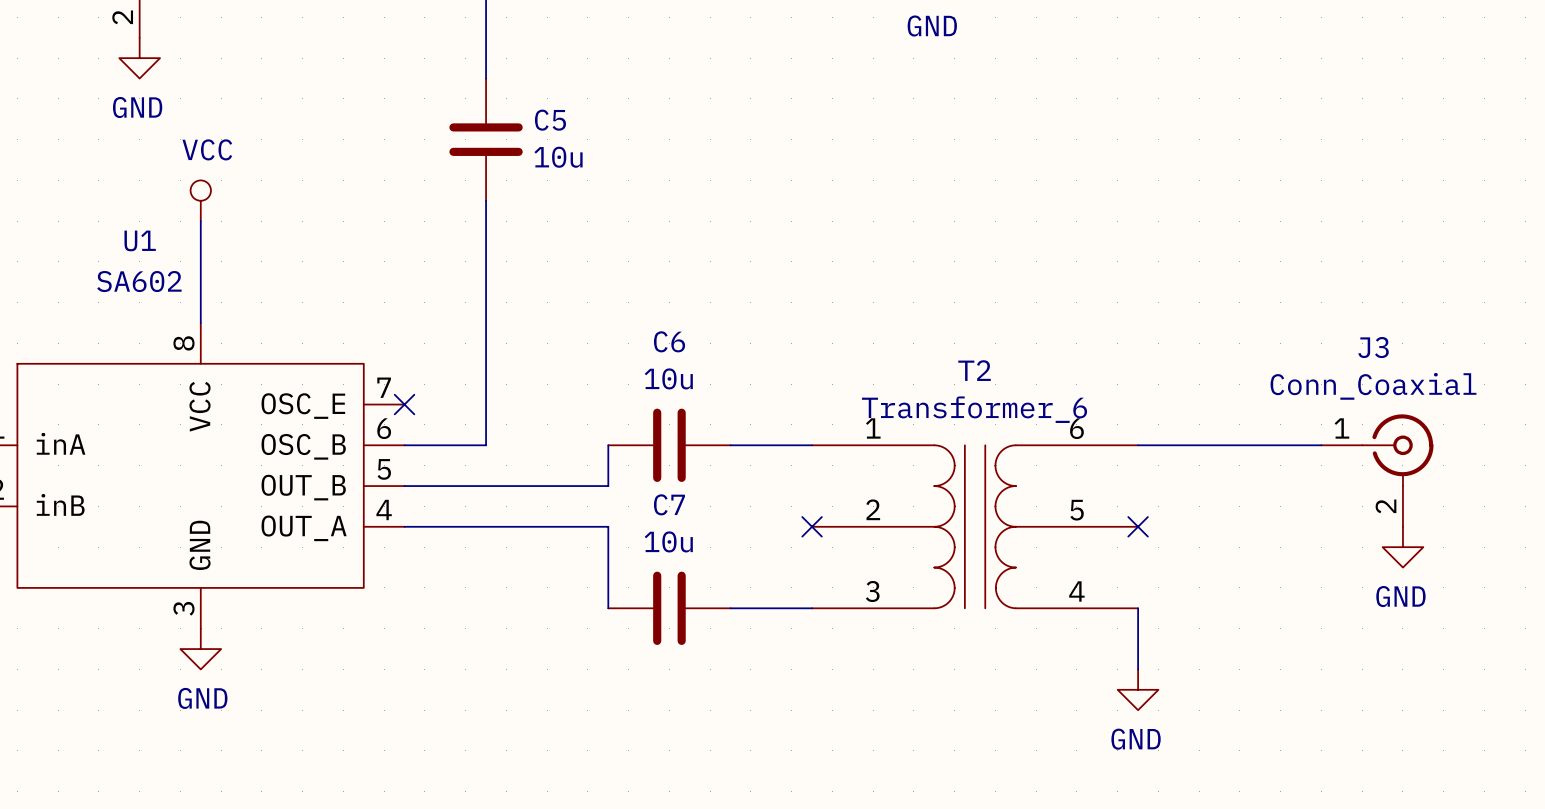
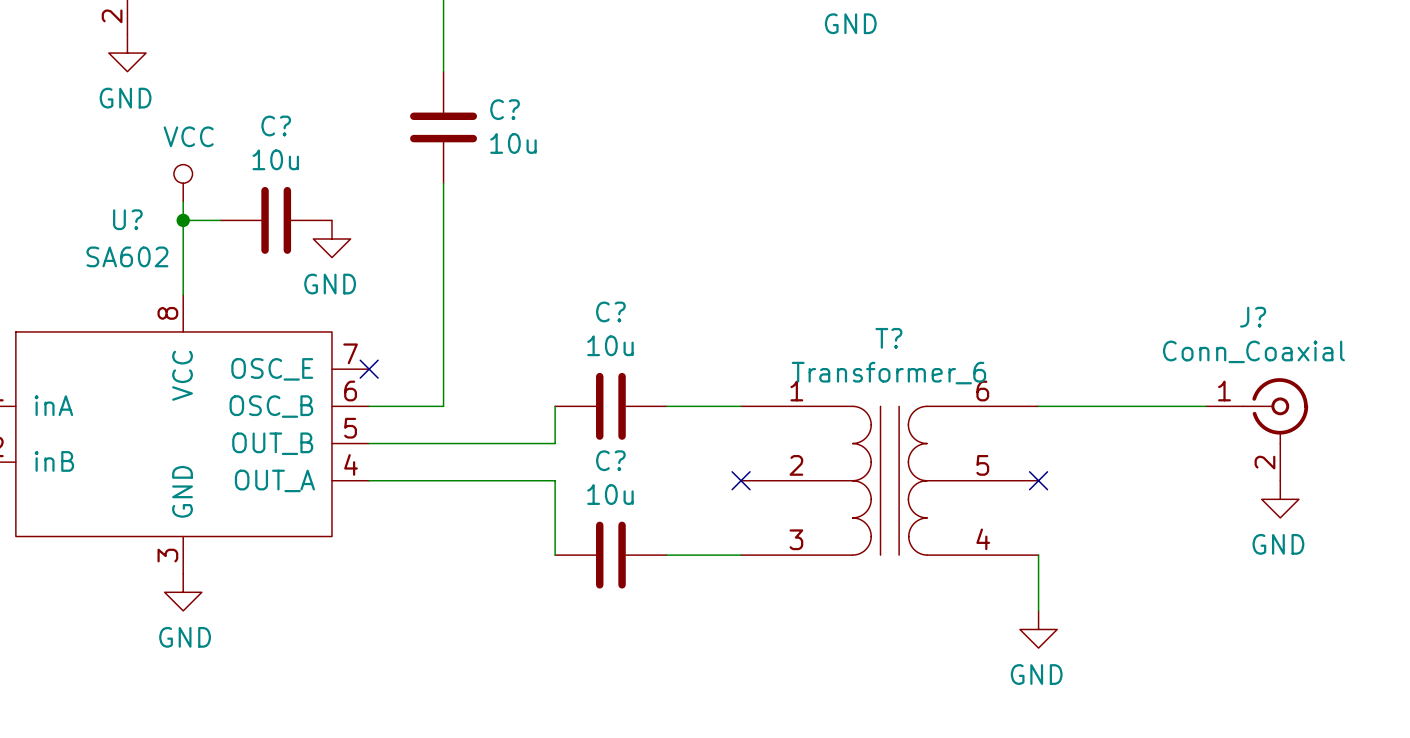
C5 name: C5 (550, 120) -> C? (505, 109)
U1 name: U1 (140, 240) -> U? (127, 219)
wire: none -> (183, 220) (220, 220)
junction: none -> (183, 220)
C?: none -> 10u (276, 220)
power symbol: none -> GND (331, 239)
C6 name: C6 (669, 341) -> C? (610, 311)
J3 name: J3 (1373, 347) -> J? (1253, 317)
T2 name: T2 (974, 370) -> T? (888, 338)
C7 name: C7 (669, 504) -> C? (610, 460)

